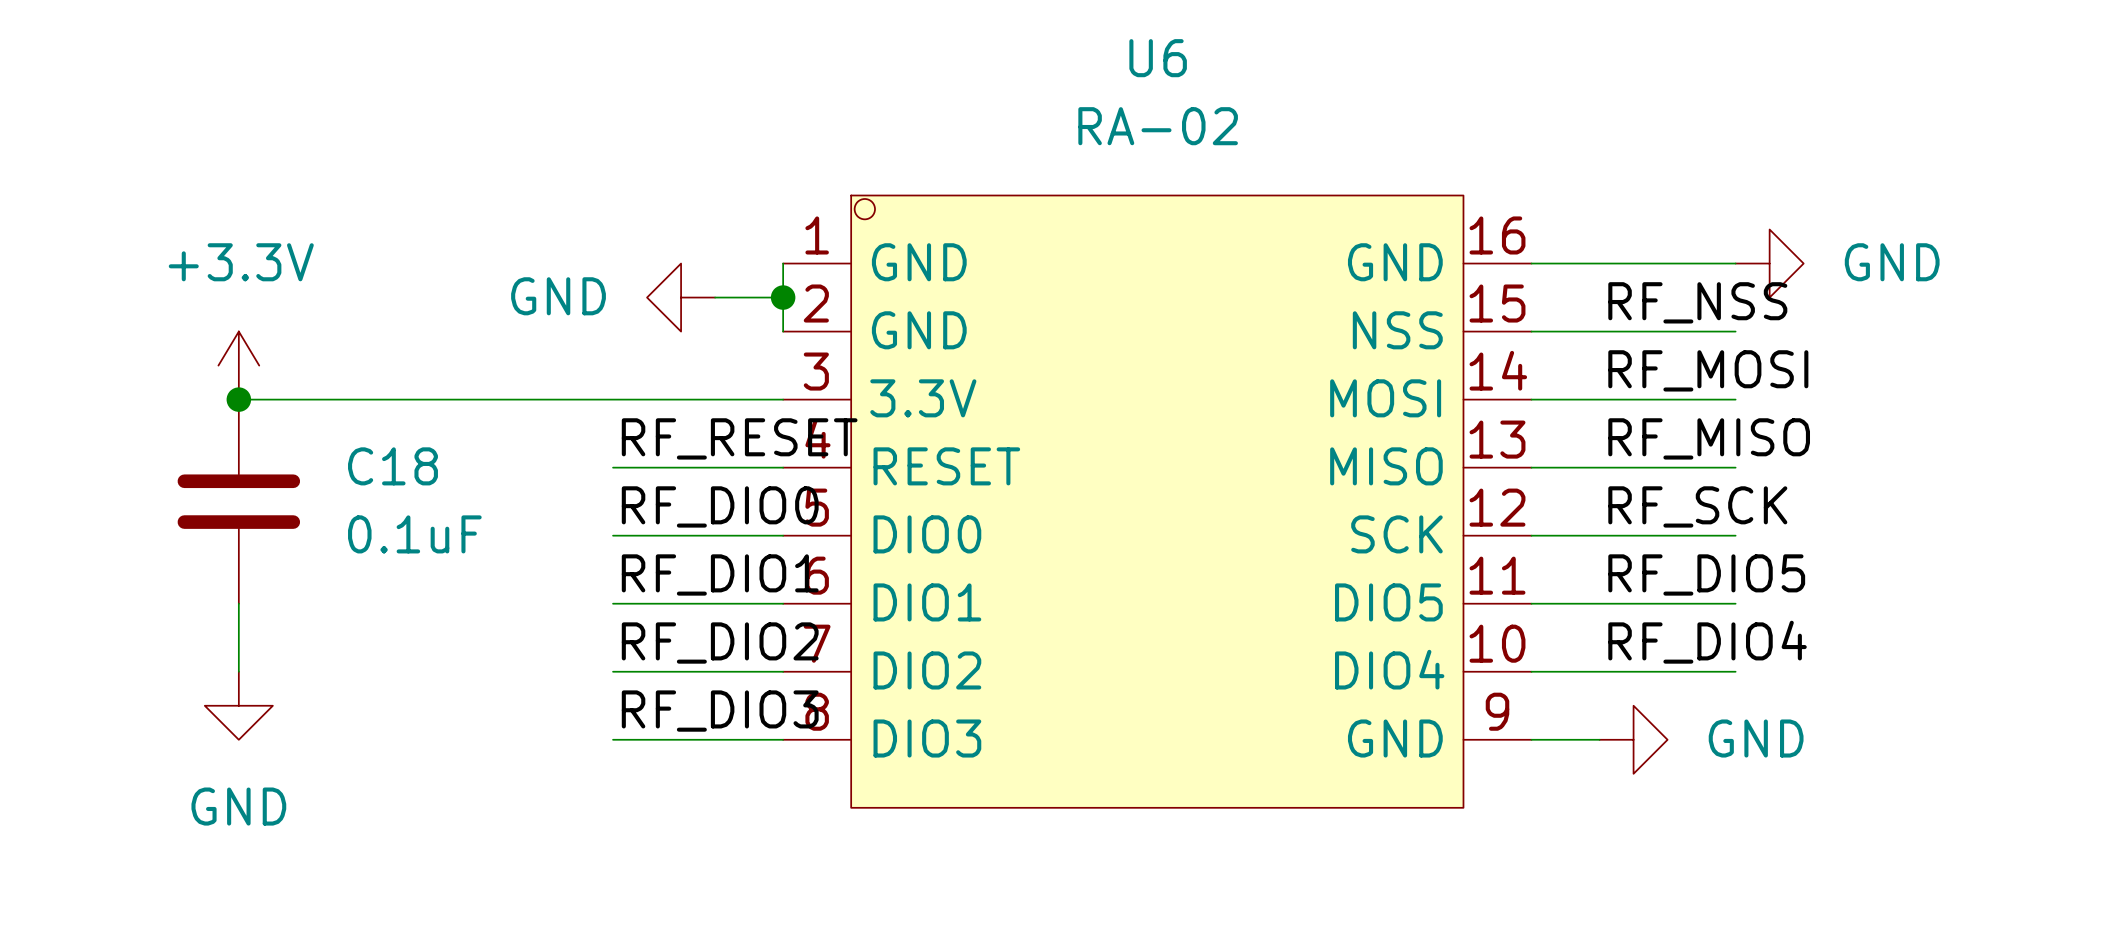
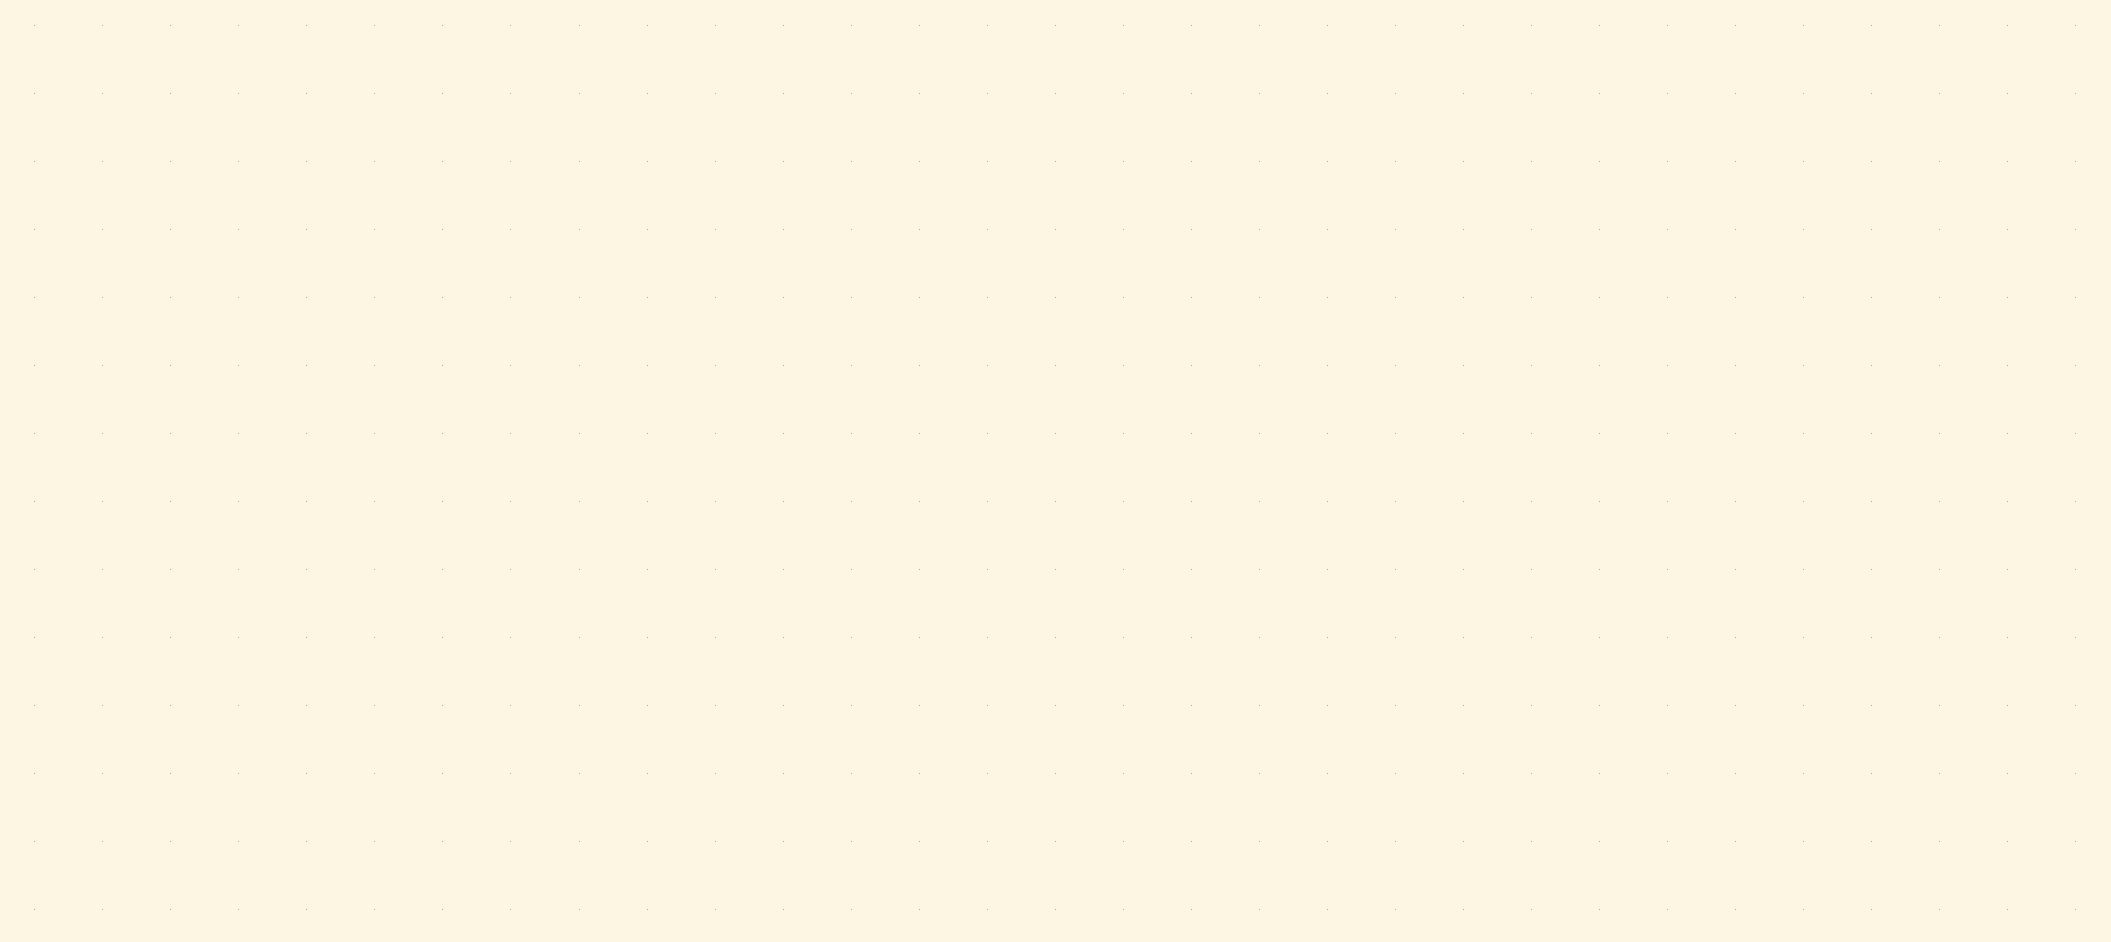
wire: (783, 263) (783, 331) -> none
wire: (1531, 263) (1735, 263) -> none
power symbol: GND (1769, 263) -> none
power symbol: GND (681, 297) -> none
wire: (715, 297) (783, 297) -> none
junction: (783, 297) -> none
label: RF_NSS (1697, 302) -> none
wire: (1531, 331) (1735, 331) -> none
power symbol: +3.3V (238, 365) -> none
label: RF_MOSI (1708, 370) -> none
wire: (238, 399) (783, 399) -> none
junction: (238, 399) -> none
wire: (1531, 399) (1735, 399) -> none
label: RF_RESET (739, 438) -> none
label: RF_MISO (1709, 438) -> none
wire: (613, 467) (783, 467) -> none
wire: (1531, 467) (1735, 467) -> none
C18: 0.1uF (238, 501) -> none
U6: RA-02 (1157, 501) -> none
label: RF_DIO0 (720, 506) -> none
label: RF_SCK (1697, 506) -> none
wire: (613, 535) (783, 535) -> none
wire: (1531, 535) (1735, 535) -> none
label: RF_DIO1 (720, 574) -> none
label: RF_DIO5 (1706, 574) -> none
wire: (238, 603) (238, 671) -> none
wire: (613, 603) (783, 603) -> none
wire: (1531, 603) (1735, 603) -> none
label: RF_DIO4 (1707, 642) -> none
label: RF_DIO2 (720, 643) -> none
wire: (613, 671) (783, 671) -> none
wire: (1531, 671) (1735, 671) -> none
power symbol: GND (238, 705) -> none
label: RF_DIO3 (720, 711) -> none
wire: (613, 739) (783, 739) -> none
wire: (1531, 739) (1599, 739) -> none
power symbol: GND (1633, 739) -> none

